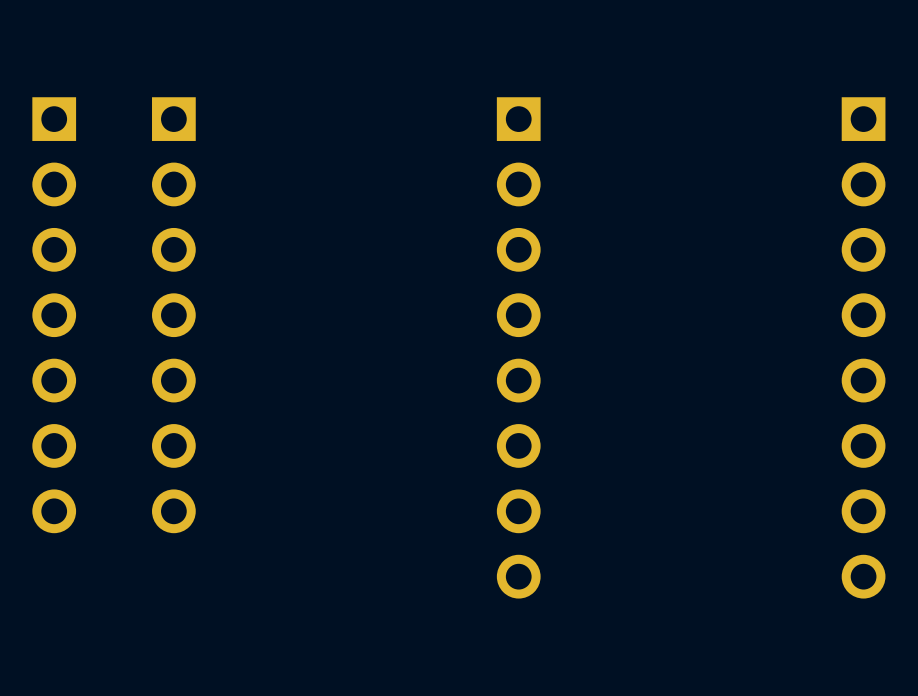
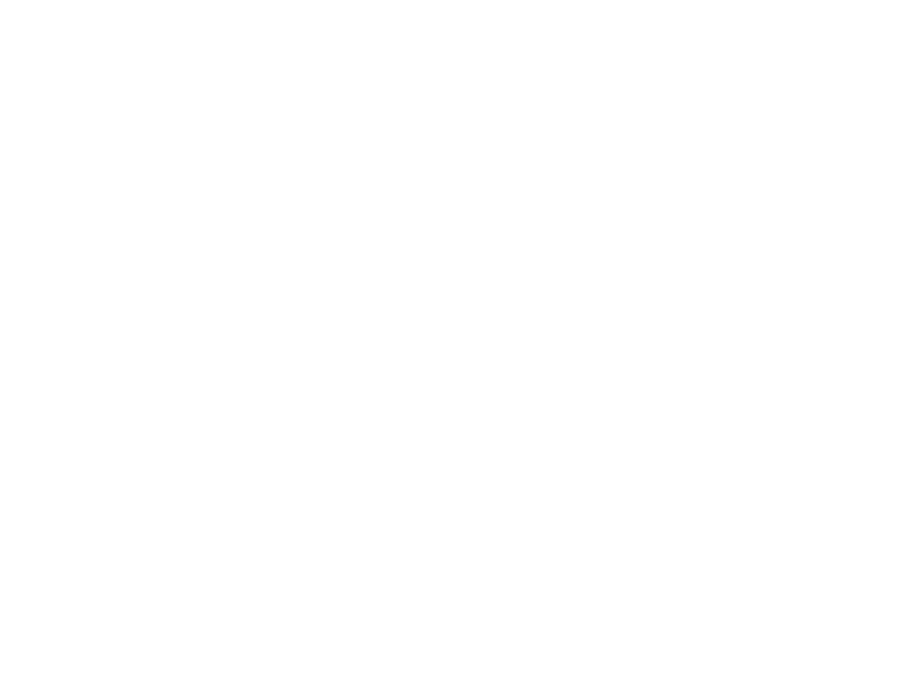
part: (54, 315) -> none
part: (173, 315) -> none
part: (518, 347) -> none
part: (863, 347) -> none

